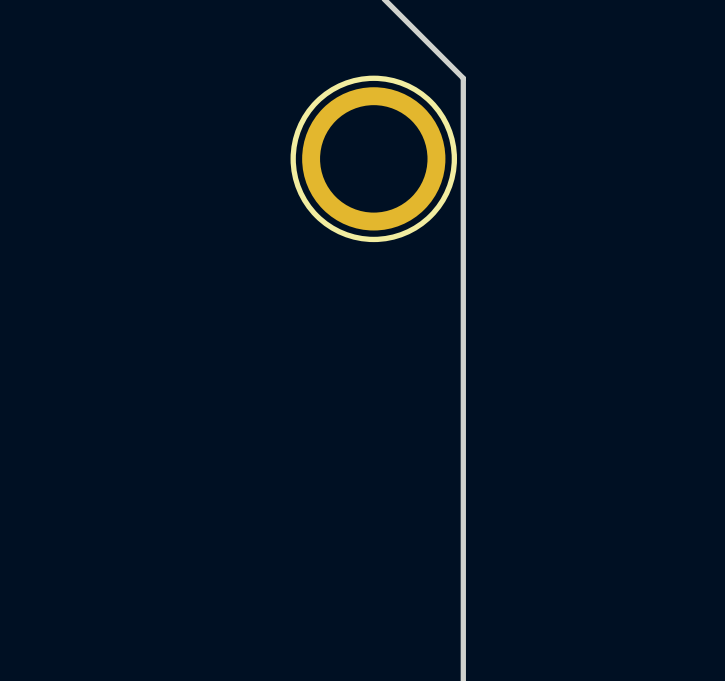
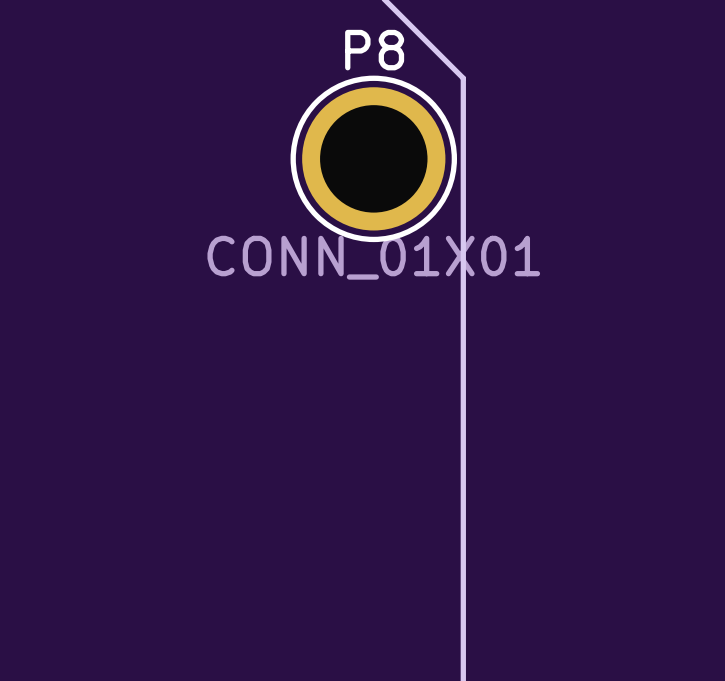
P8 name: none -> P8 (374, 50)
P8 value: none -> CONN_01X01 (373, 257)

